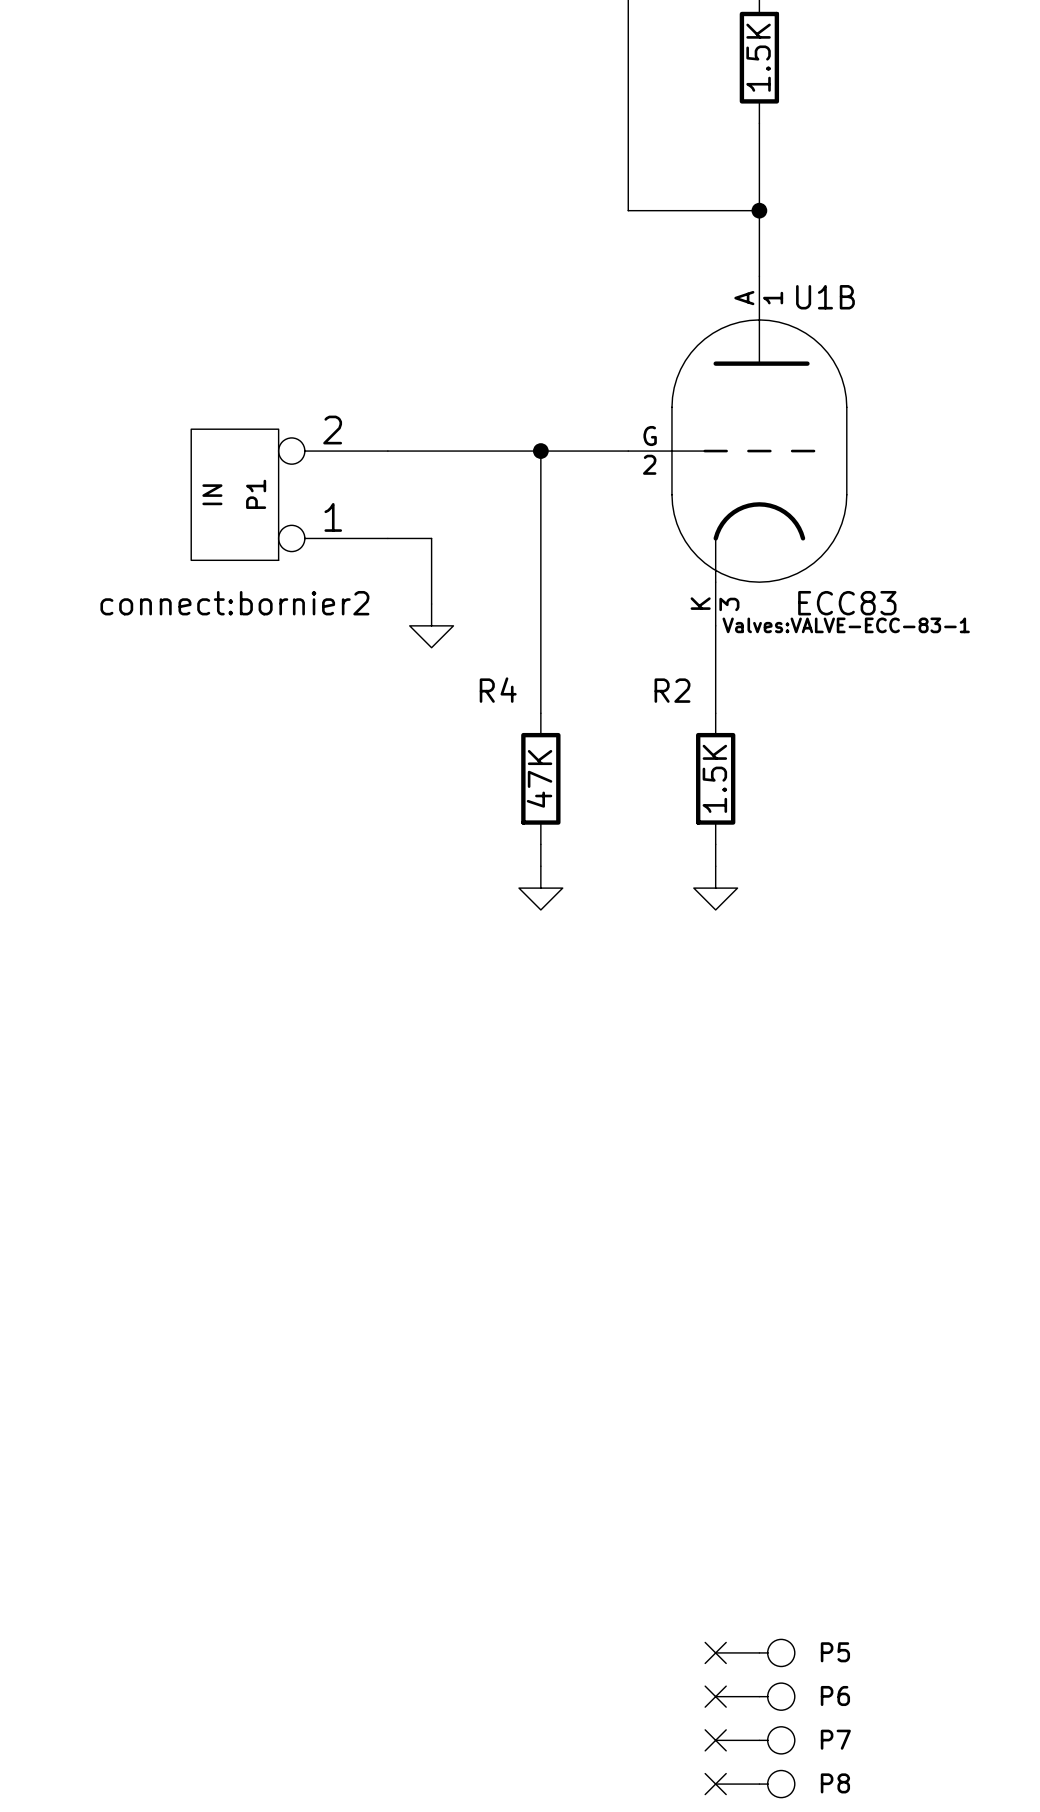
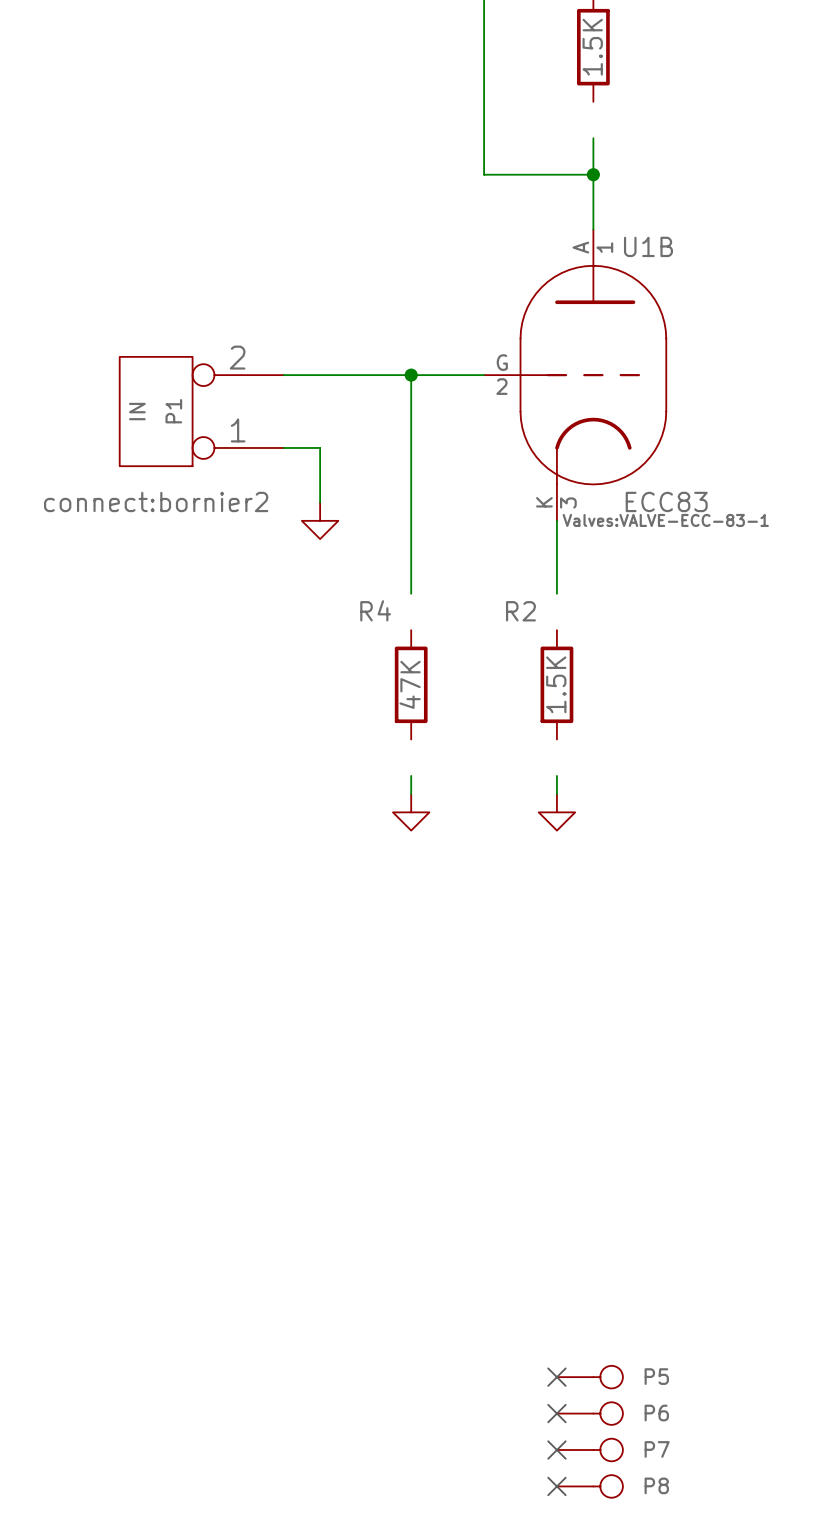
wire: (759, 123) (759, 166) -> none
R4 position: (540, 778) -> (411, 684)
R2 position: (715, 778) -> (556, 684)
wire: (540, 844) (540, 866) -> (411, 775) (411, 794)
wire: (715, 844) (715, 866) -> (556, 775) (556, 794)
power symbol position: (540, 888) -> (411, 812)
power symbol position: (715, 888) -> (556, 812)

